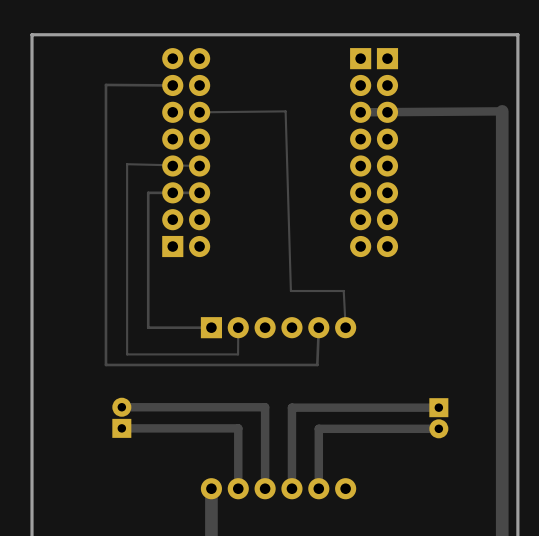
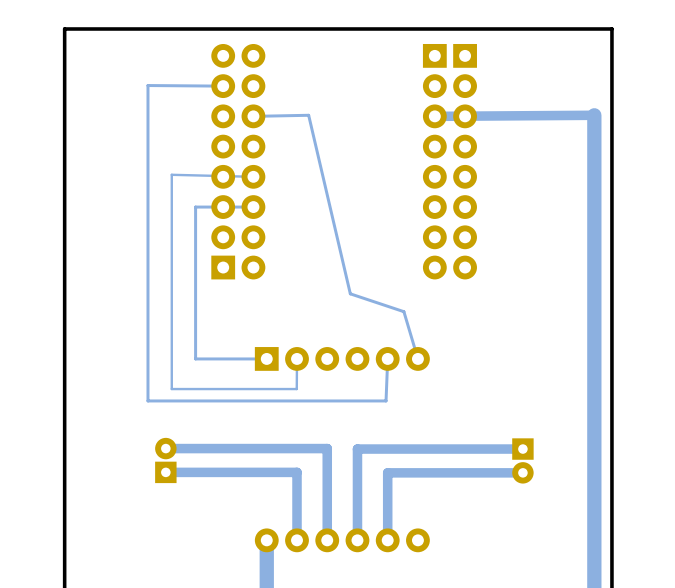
track: (199, 112) (285, 111) (290, 291) (343, 291) (345, 327) -> (253, 116) (308, 115) (350, 293) (403, 311) (417, 358)

